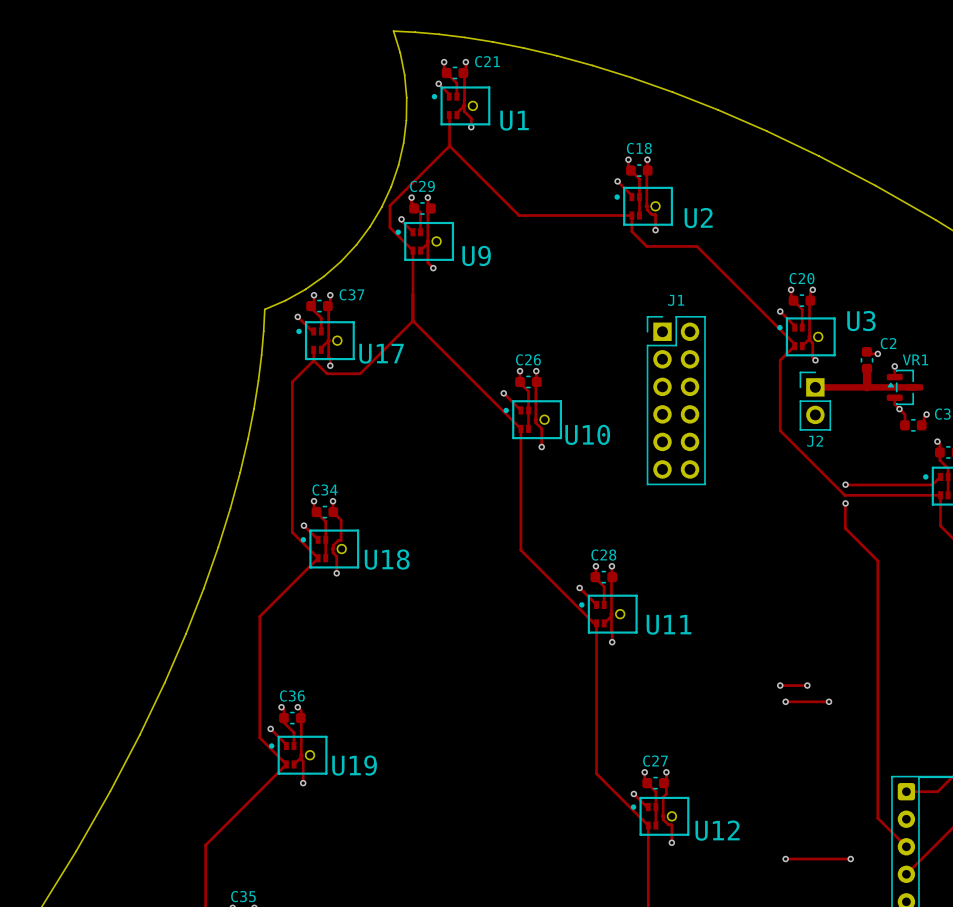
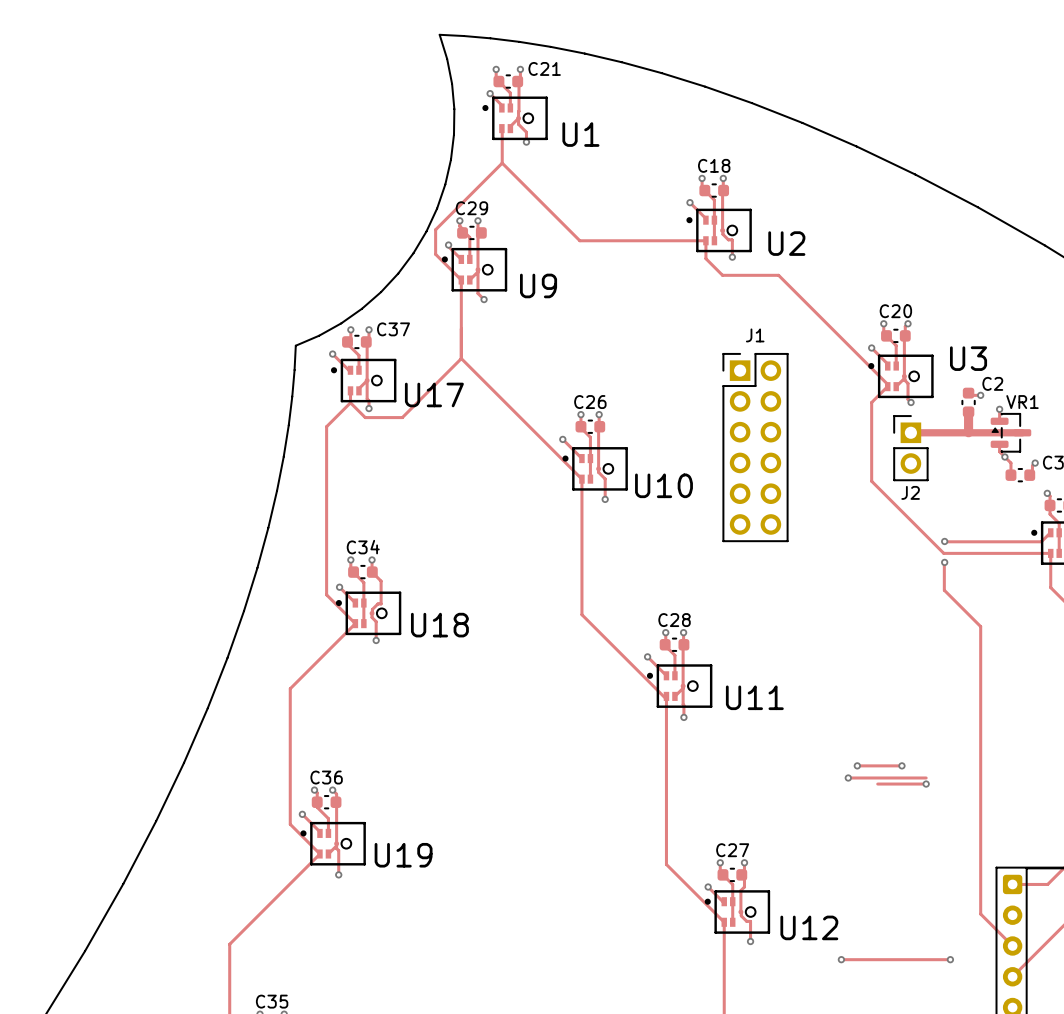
track: none -> (857, 765) (871, 765)
via: none -> (857, 765)
via: (780, 685) -> none
track: none -> (848, 777) (926, 777)
via: none -> (848, 777)
via: (785, 701) -> none
track: none -> (841, 959) (877, 959)
via position: (785, 859) -> (841, 959)

